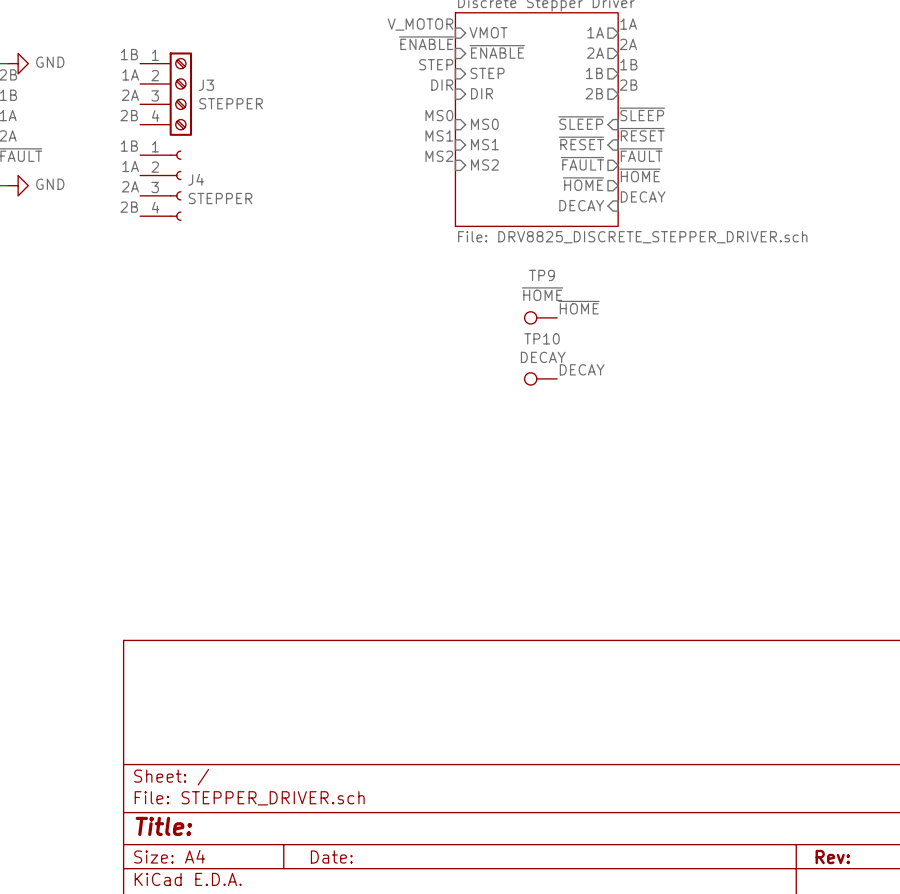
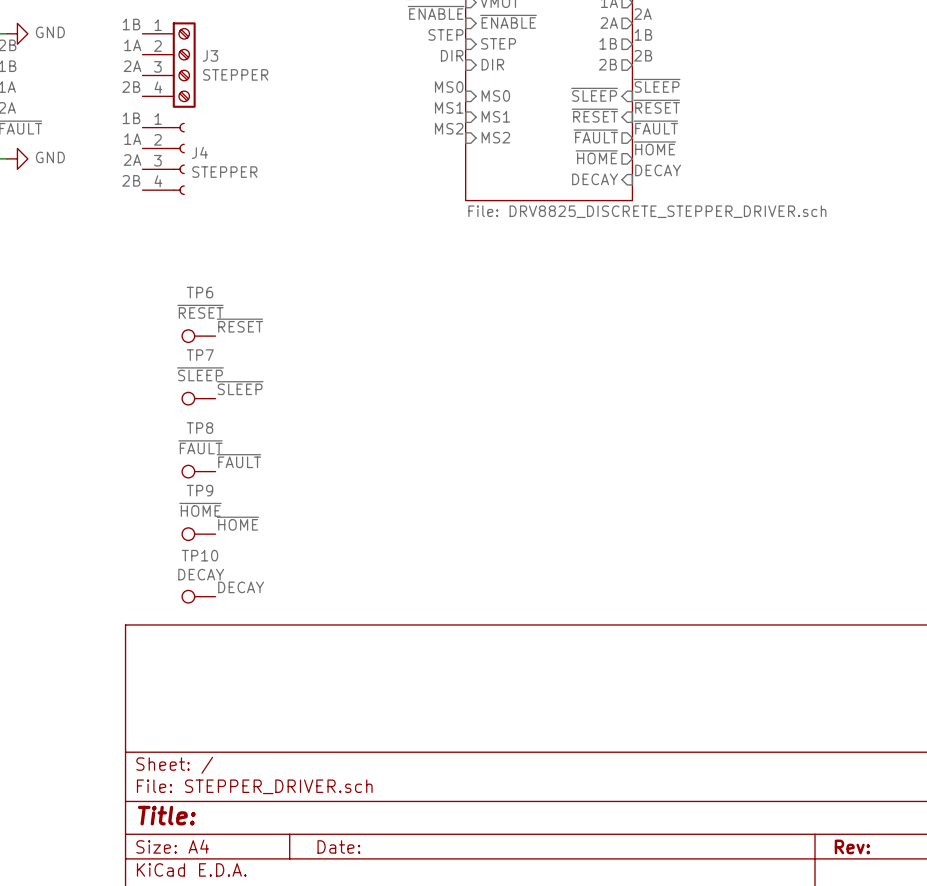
label: ~{HOME} (579, 307) -> none
TP9 position: (540, 317) -> (198, 534)
label: none -> ~{RESET} (239, 325)
TP6: none -> ~{RESET} (198, 336)
label: DECAY (582, 369) -> none
TP10 position: (540, 378) -> (198, 596)
label: none -> ~{SLEEP} (240, 388)
TP7: none -> ~{SLEEP} (198, 398)
label: none -> ~{FAULT} (238, 461)
TP8: none -> ~{FAULT} (198, 471)
label: none -> ~{HOME} (237, 523)
label: none -> DECAY (241, 587)

